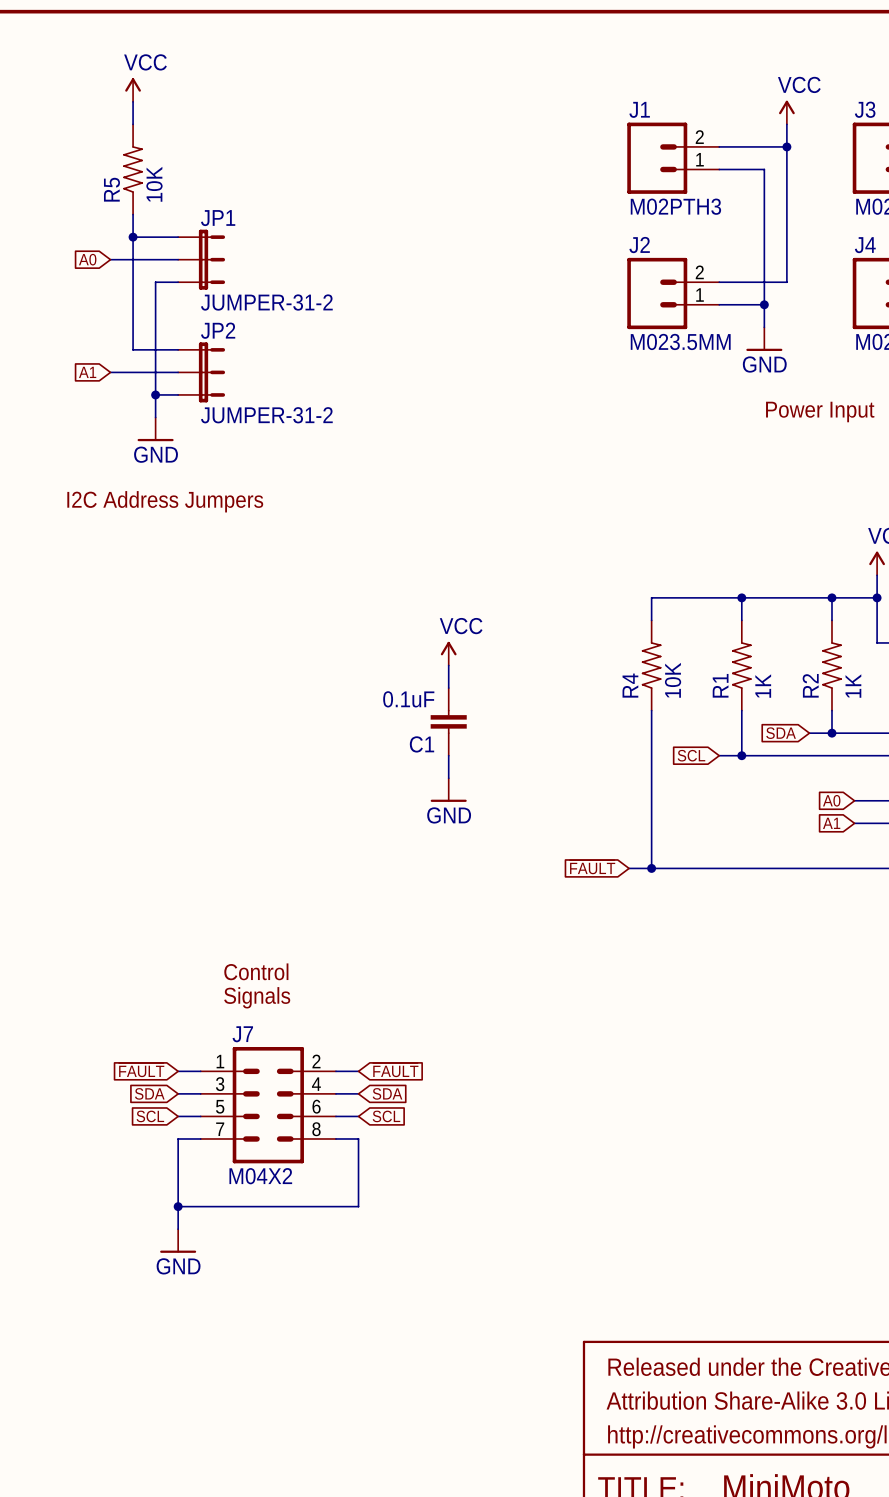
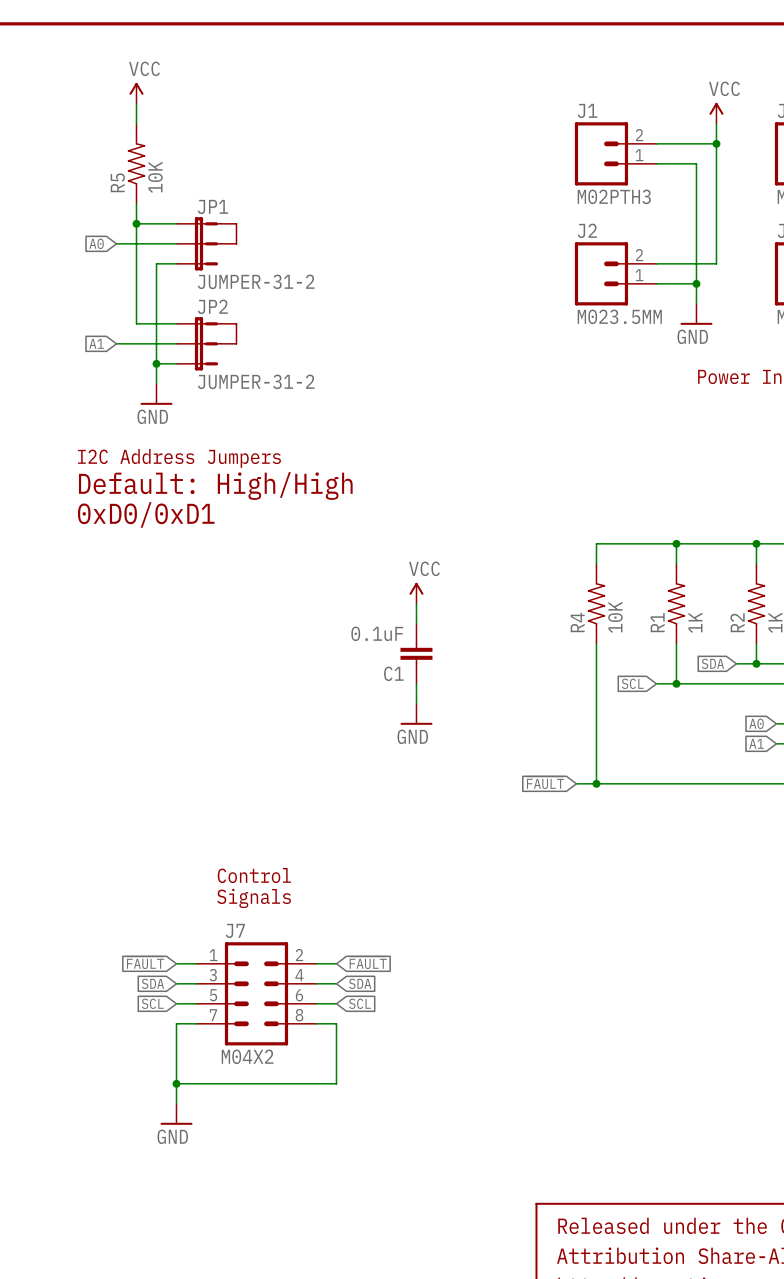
line: none -> (216, 223) (236, 223) (236, 243) (216, 243)
line: none -> (216, 323) (236, 323) (236, 343) (216, 343)
text: none -> Default: High/High (215, 485)
text: none -> 0xD0/0xD1 (146, 514)

